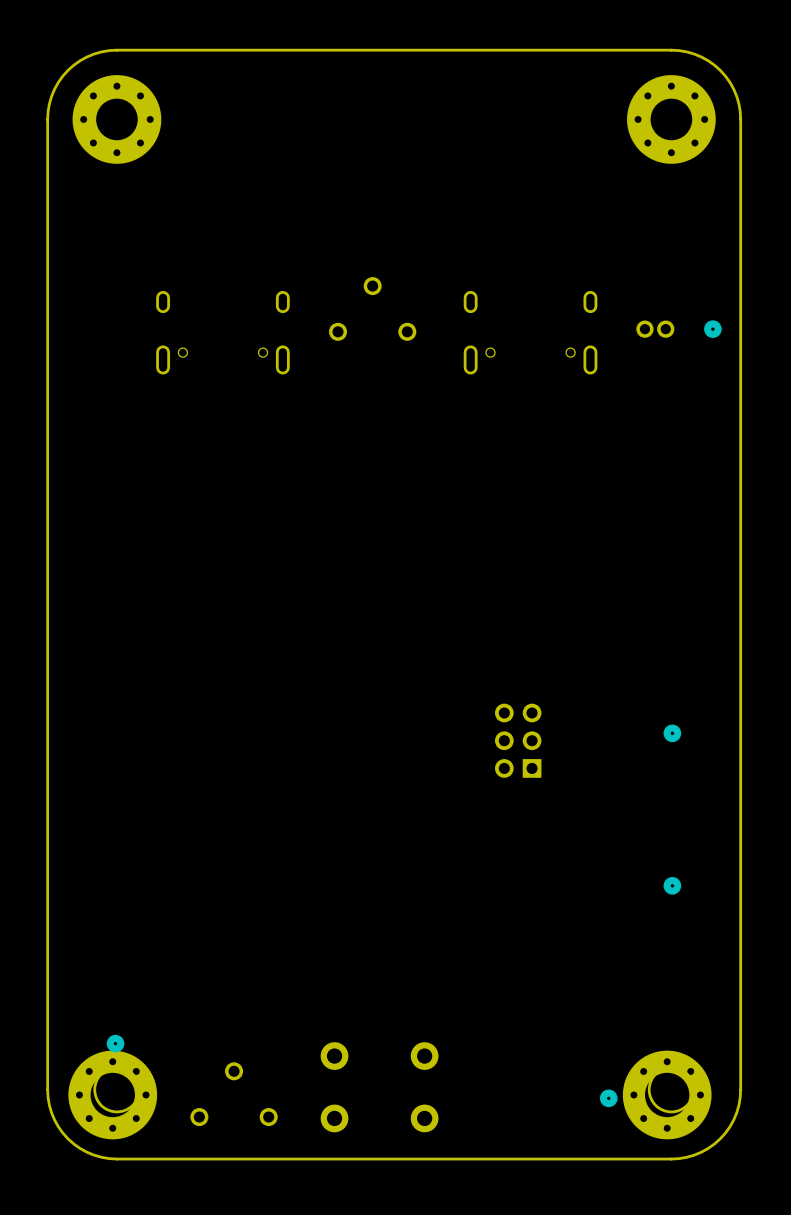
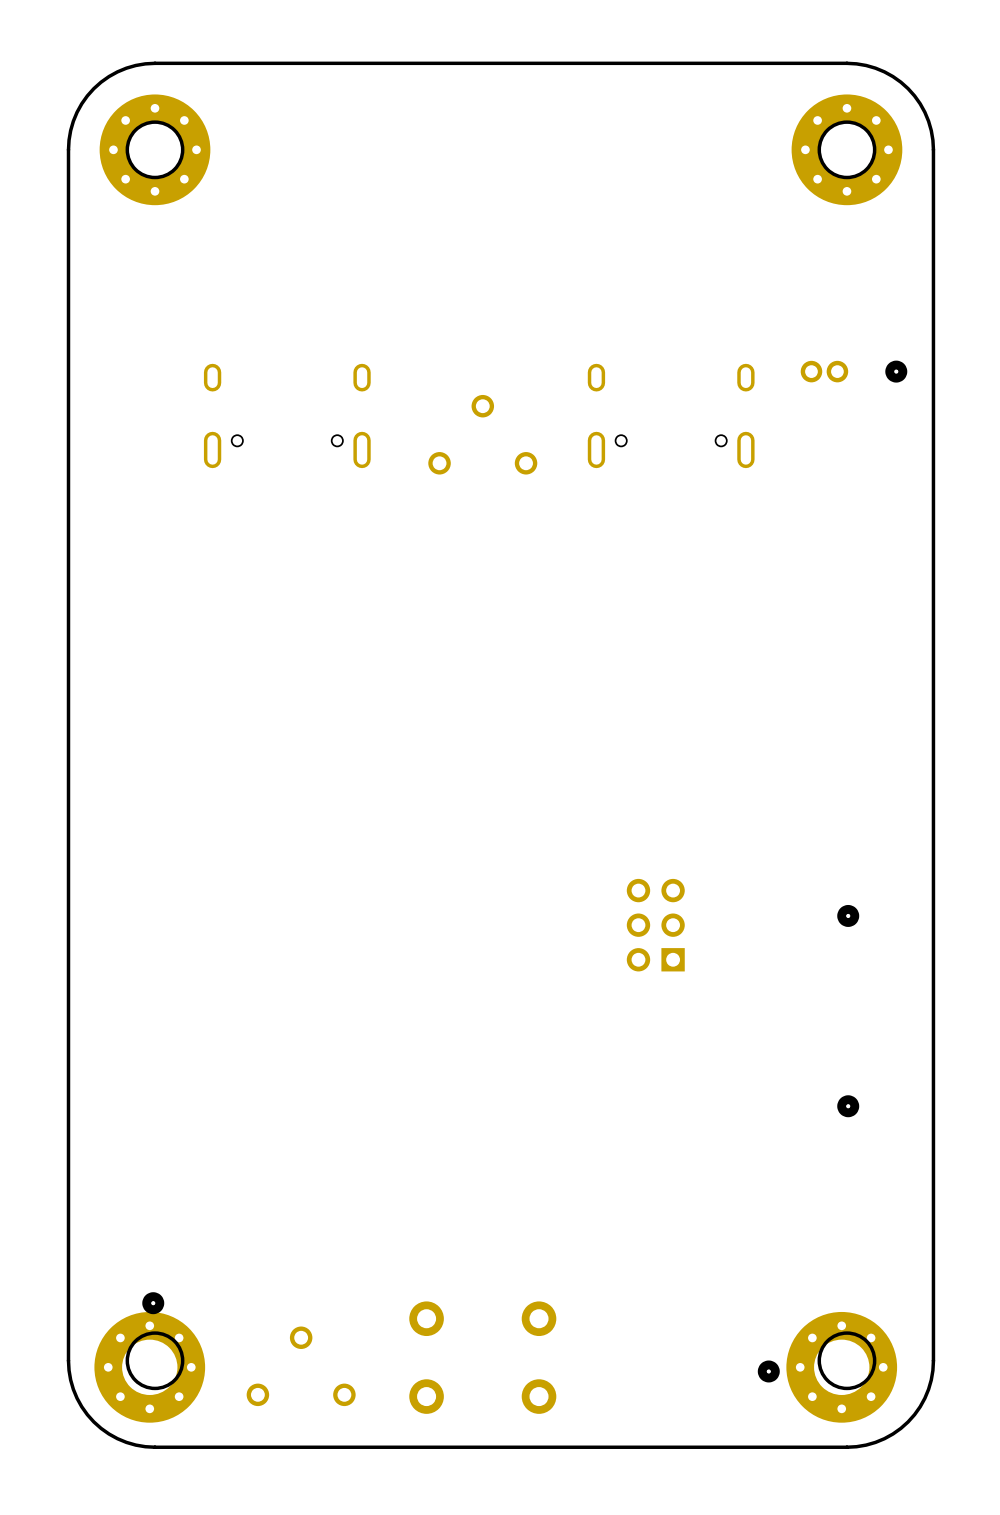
part position: (372, 308) -> (482, 434)
part position: (679, 329) -> (853, 371)

